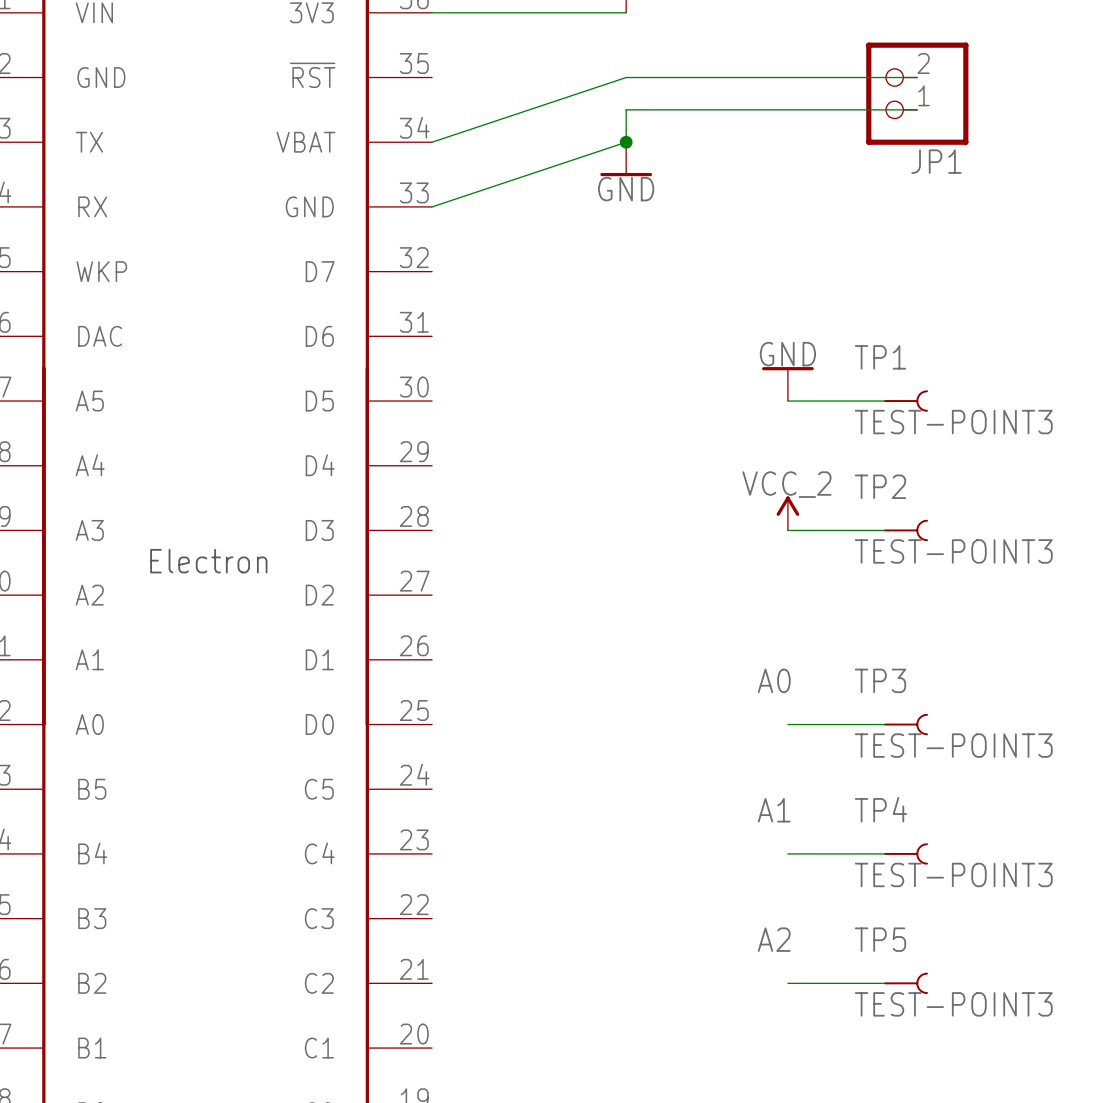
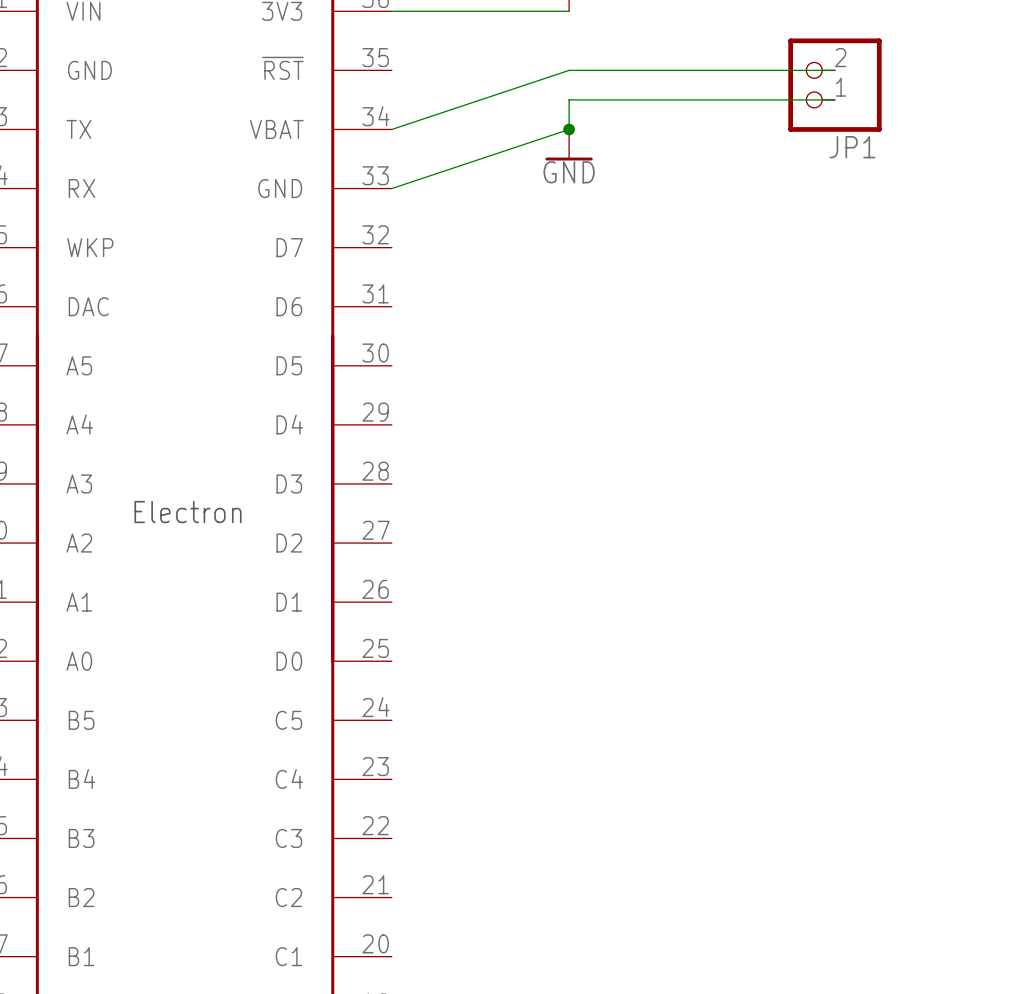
power symbol: GND (787, 384) -> none
wire: (787, 401) (884, 401) -> none
TP1: TEST-POINT3 (905, 401) -> none
power symbol: VCC_2 (787, 513) -> none
wire: (787, 530) (884, 530) -> none
TP2: TEST-POINT3 (905, 530) -> none
label: A0 (774, 680) -> none
wire: (787, 724) (884, 724) -> none
TP3: TEST-POINT3 (905, 724) -> none
label: A1 (774, 810) -> none
wire: (787, 853) (884, 853) -> none
TP4: TEST-POINT3 (905, 853) -> none
label: A2 (774, 939) -> none
wire: (787, 983) (884, 983) -> none
TP5: TEST-POINT3 (905, 983) -> none

